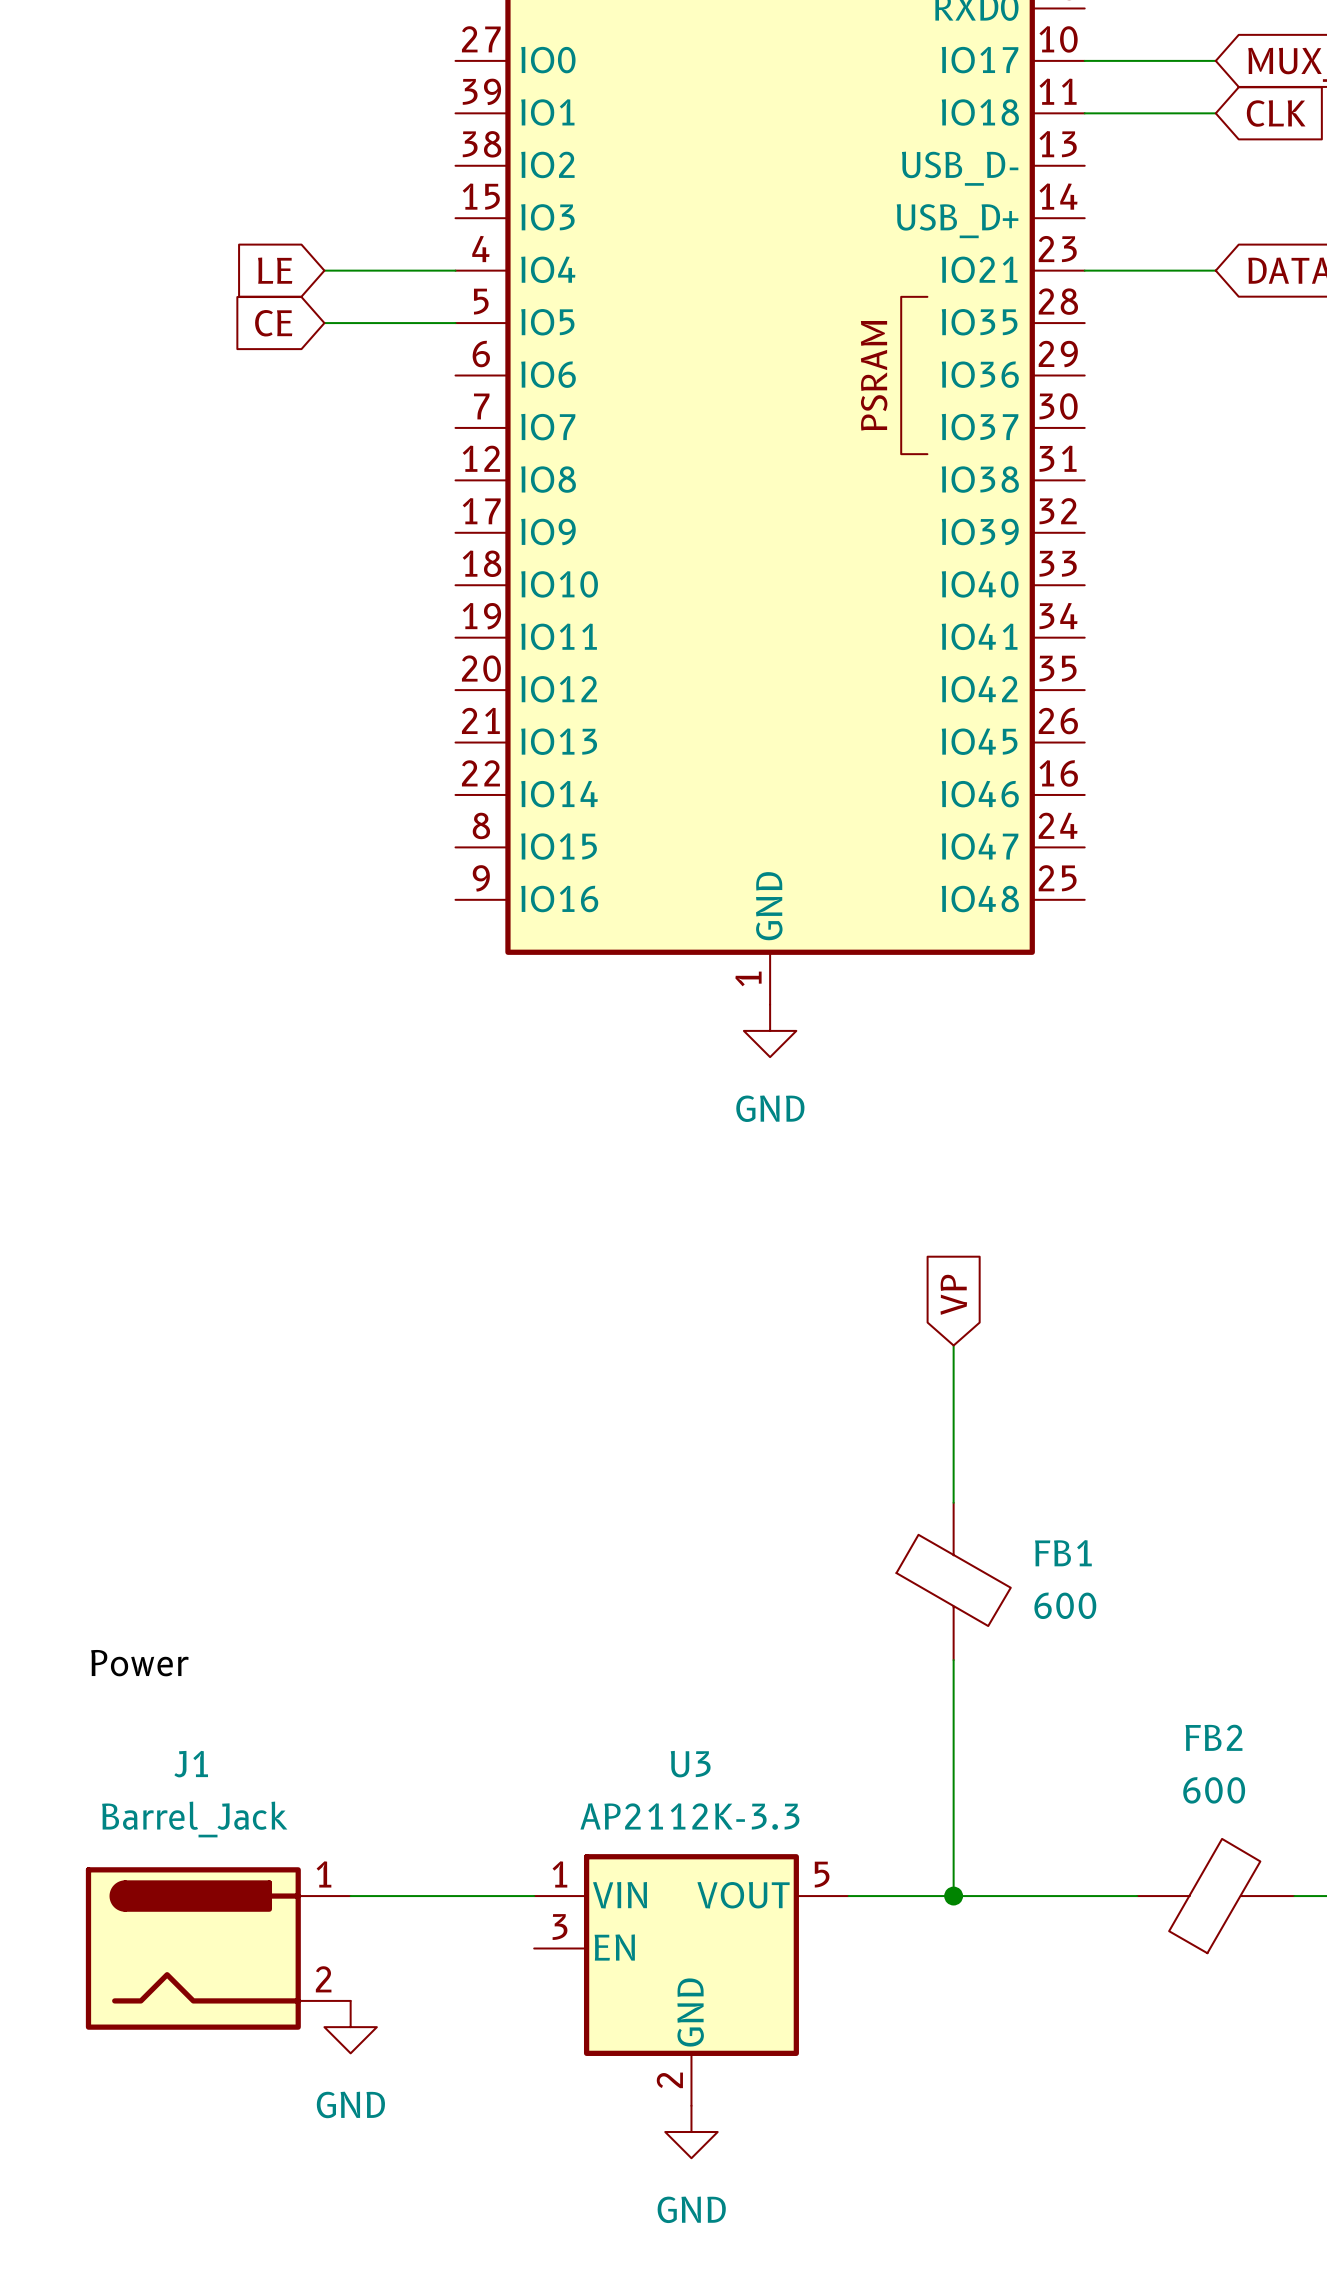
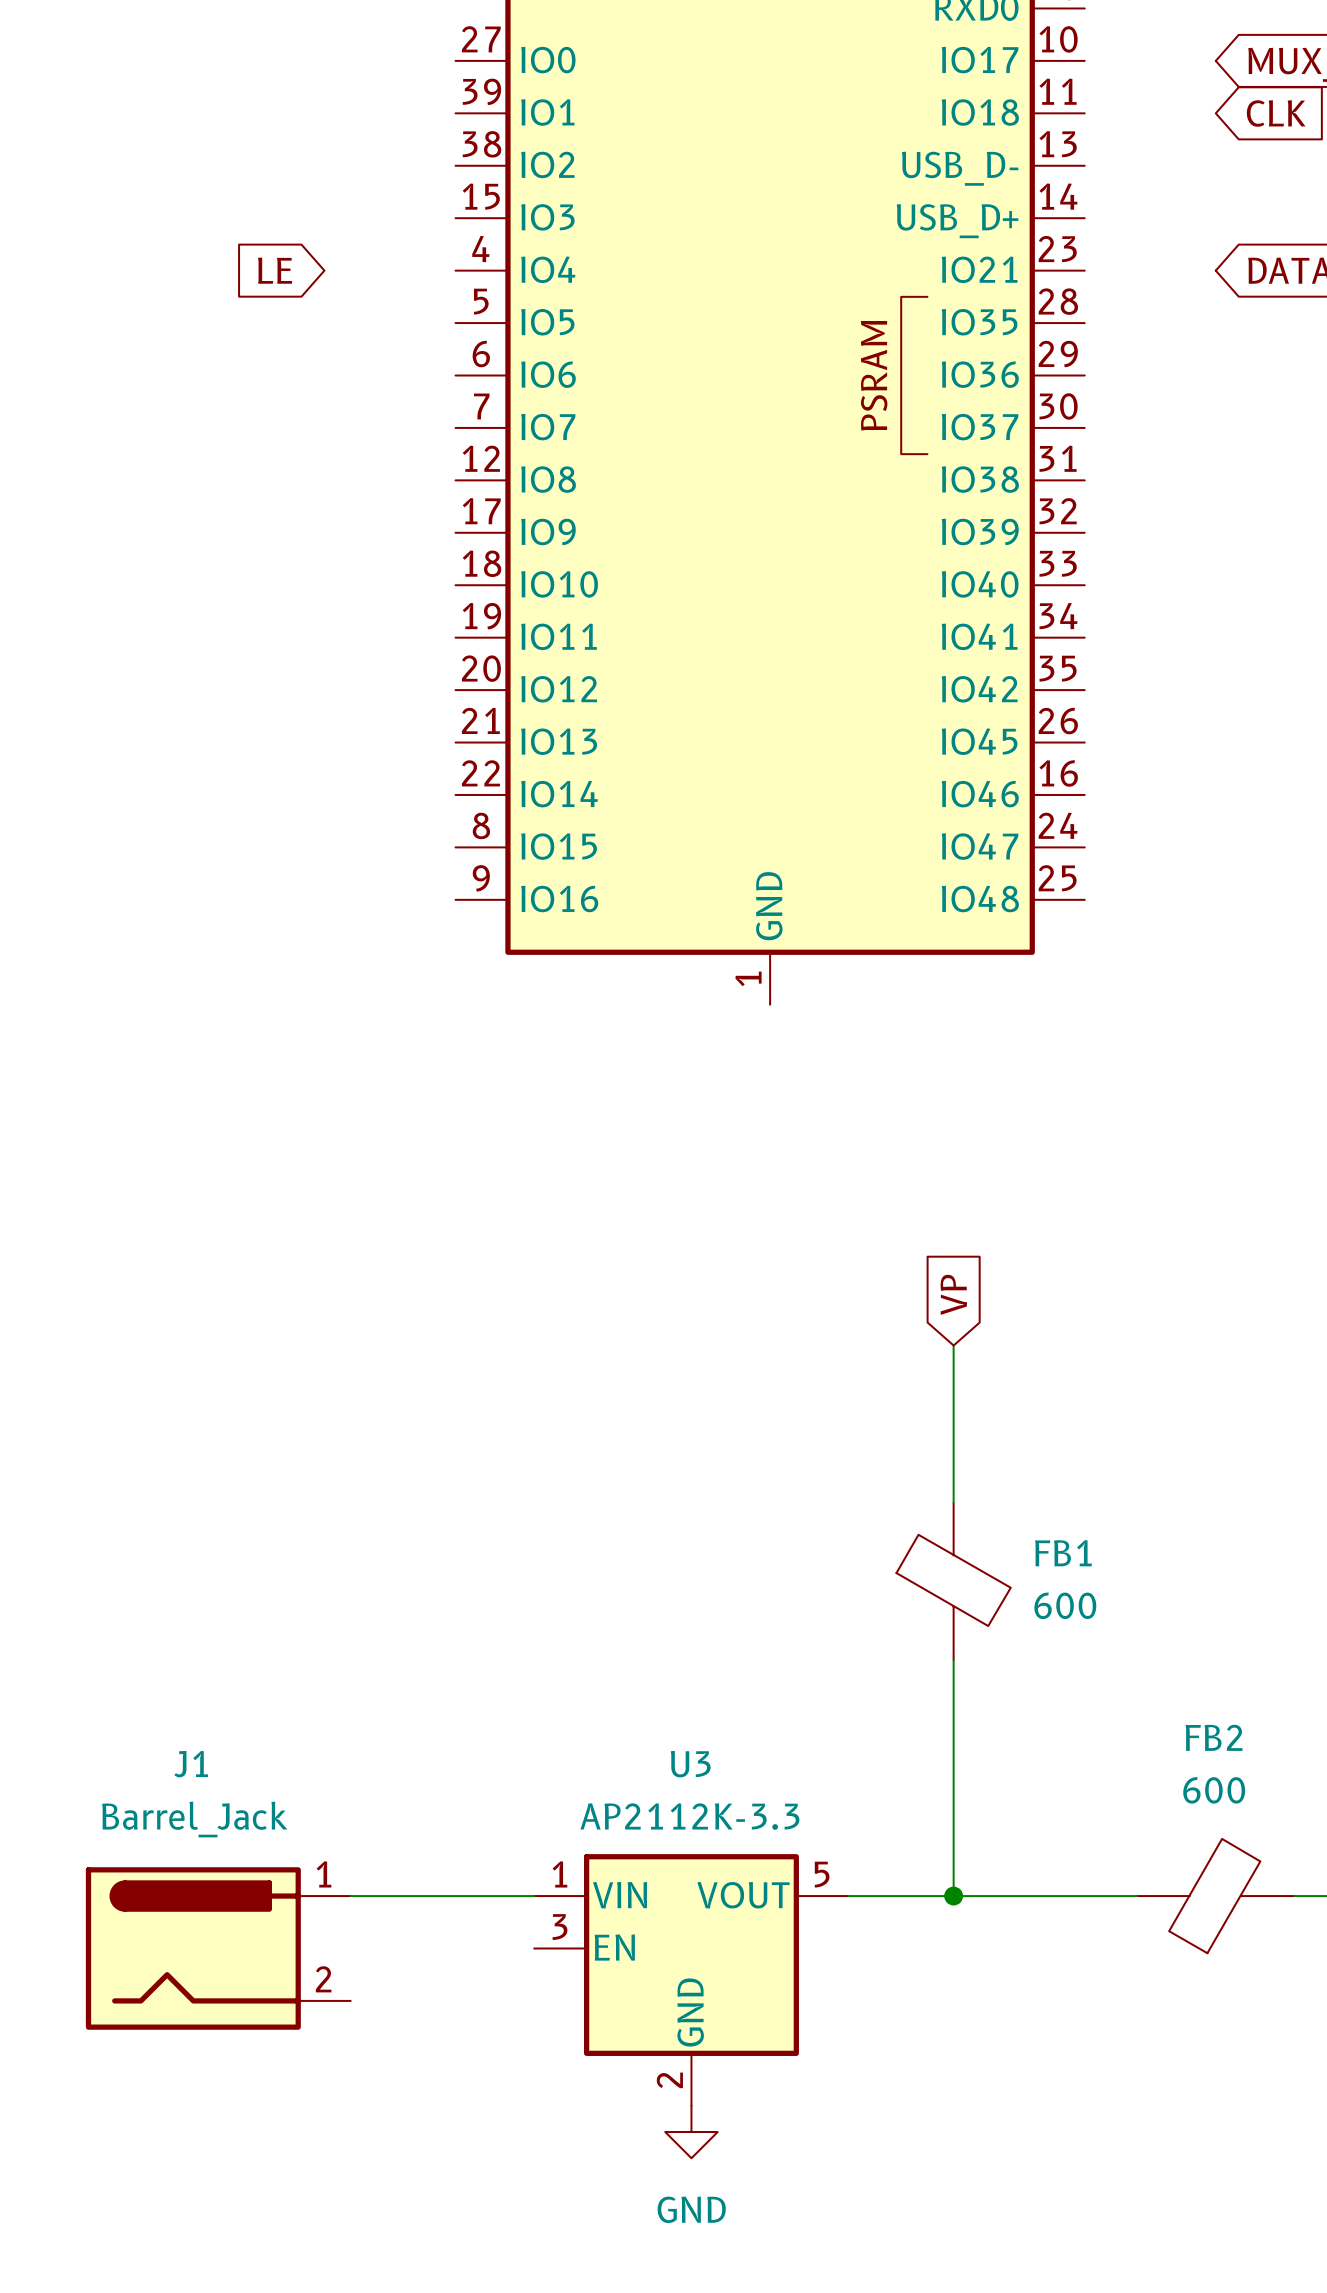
wire: (1084, 60) (1215, 60) -> none
wire: (1084, 113) (1215, 113) -> none
wire: (324, 270) (455, 270) -> none
wire: (1084, 270) (1215, 270) -> none
global label: CE (273, 323) -> none
wire: (324, 323) (455, 323) -> none
power symbol: GND (770, 1030) -> none
label: Power (139, 1663) -> none
power symbol: GND (350, 2027) -> none

